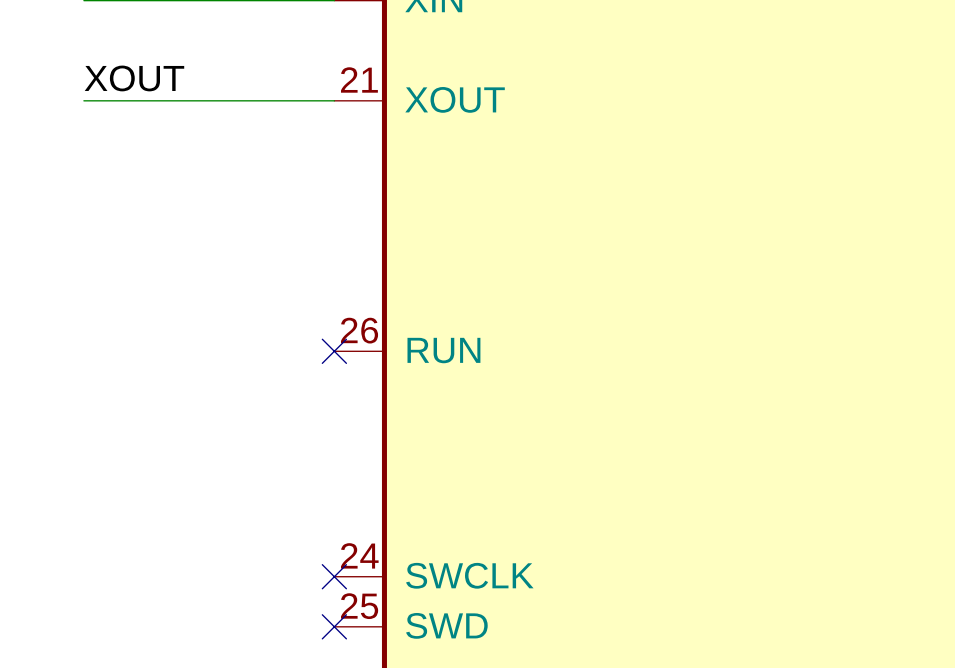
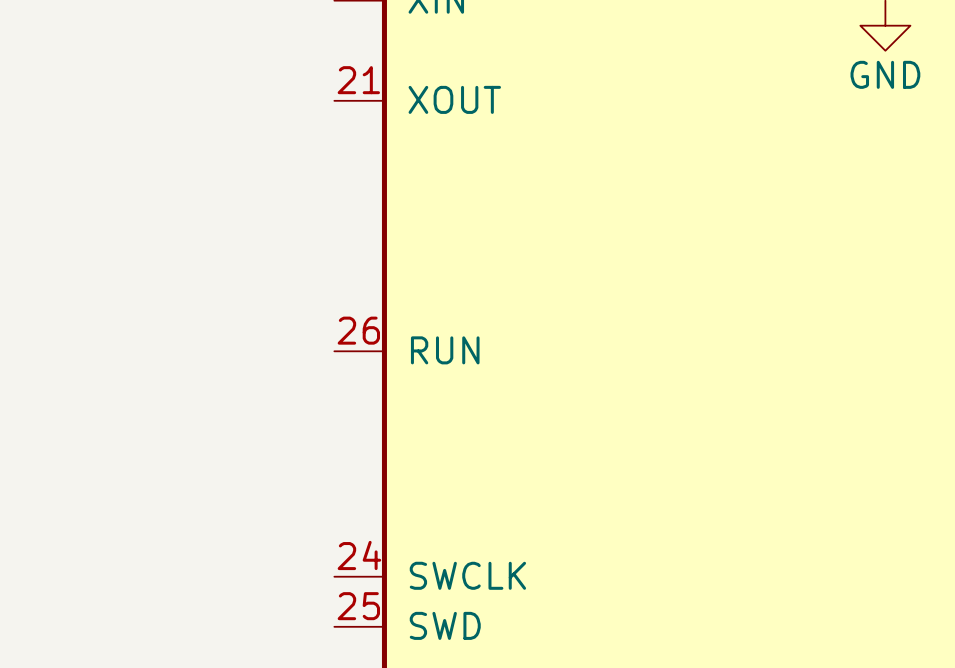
wire: (83, 0) (334, 0) -> none
power symbol: none -> GND (885, 25)
label: XOUT (134, 78) -> none
wire: (83, 100) (334, 100) -> none
no-connect mark: (334, 351) -> none
no-connect mark: (334, 576) -> none
no-connect mark: (334, 626) -> none

